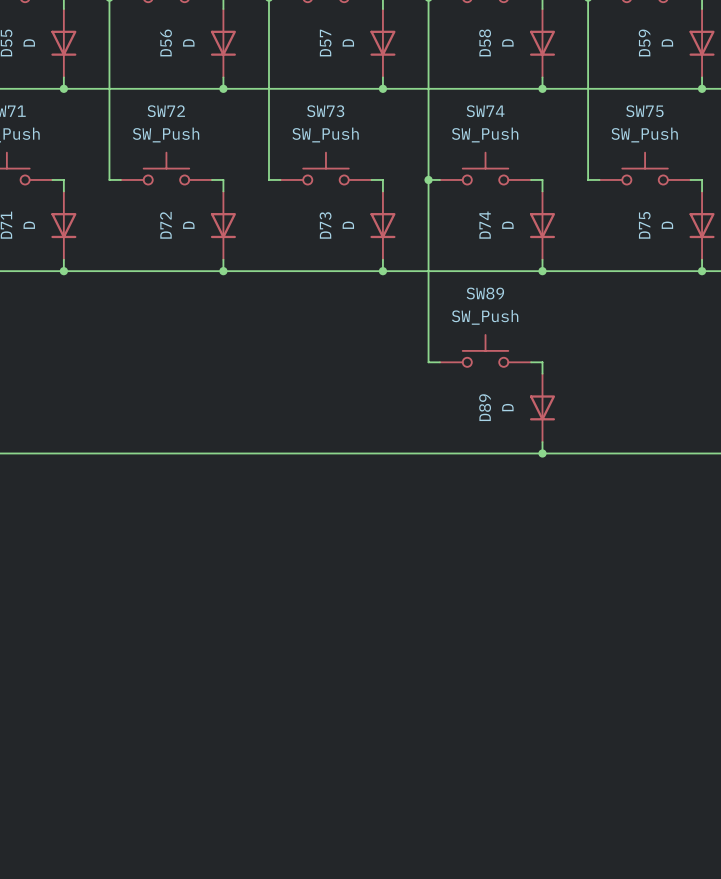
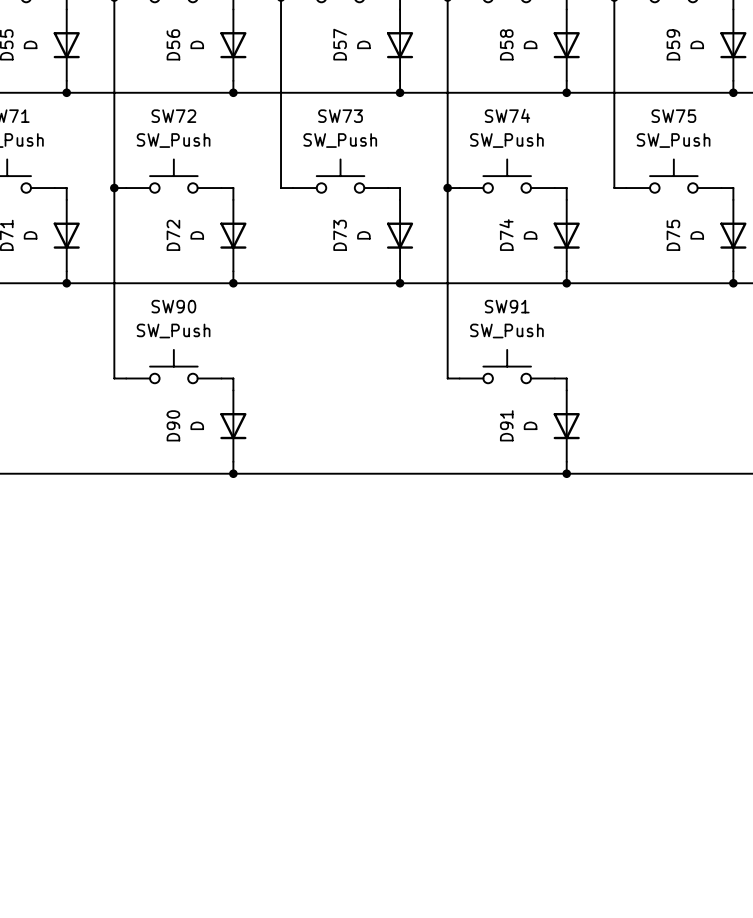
wire: none -> (114, 188) (114, 378) (126, 378)
junction: none -> (114, 188)
SW89 name: SW89 (485, 293) -> SW91 (507, 306)
SW90: none -> SW_Push (173, 366)
wire: none -> (221, 378) (233, 378) (233, 390)
D90: none -> D (233, 426)
D89 name: D89 (485, 407) -> D91 (506, 425)
wire: none -> (233, 461) (233, 473)
junction: none -> (233, 473)

